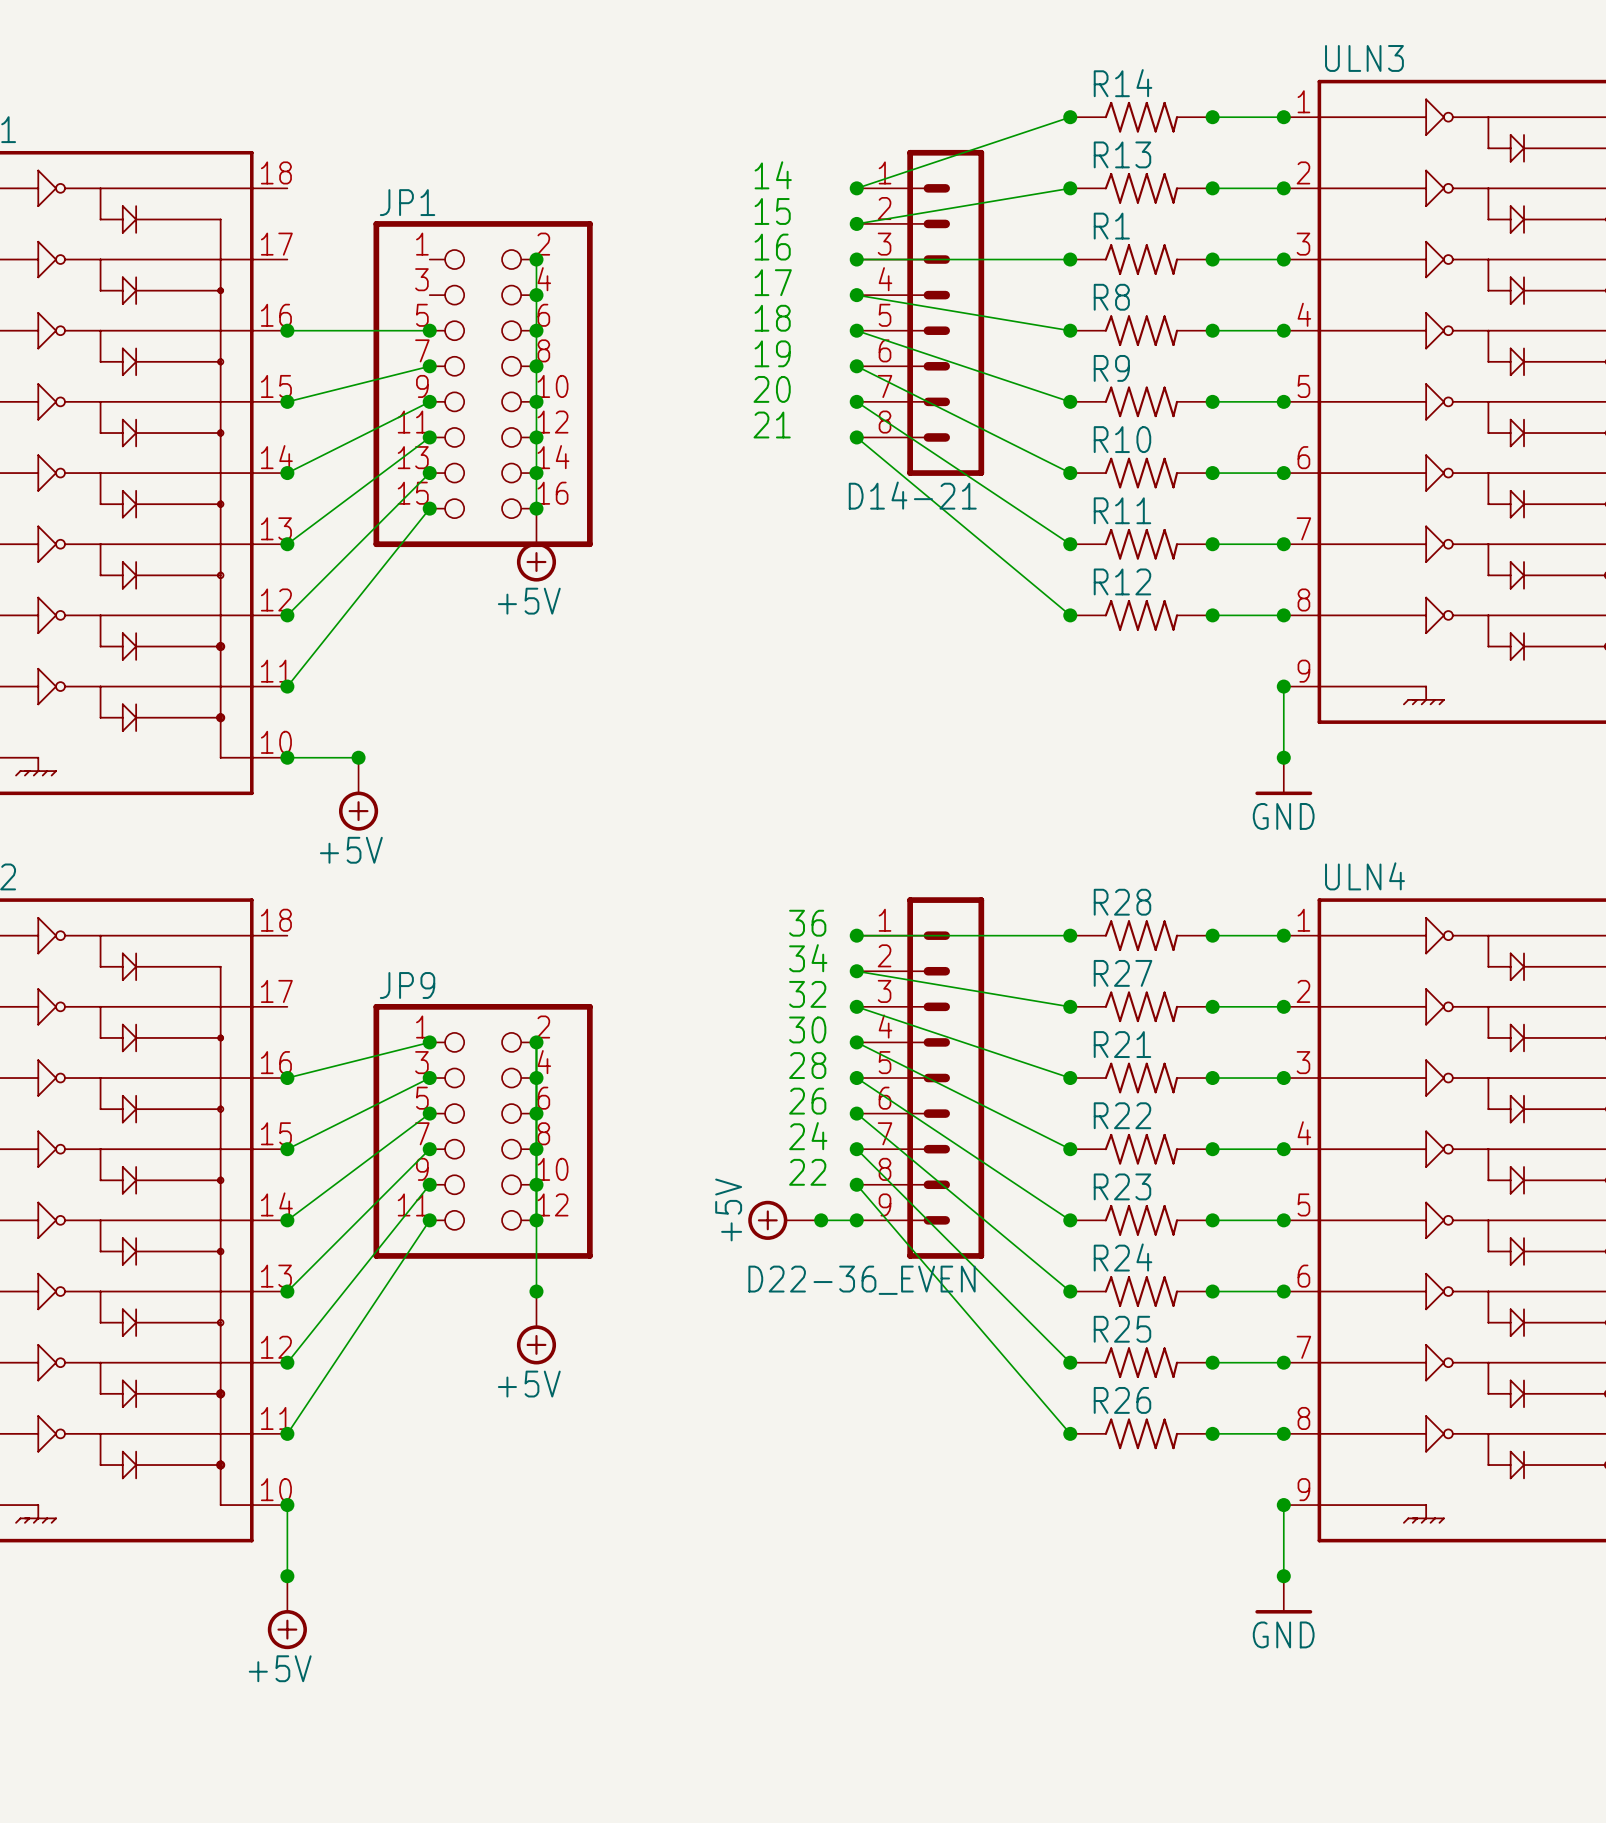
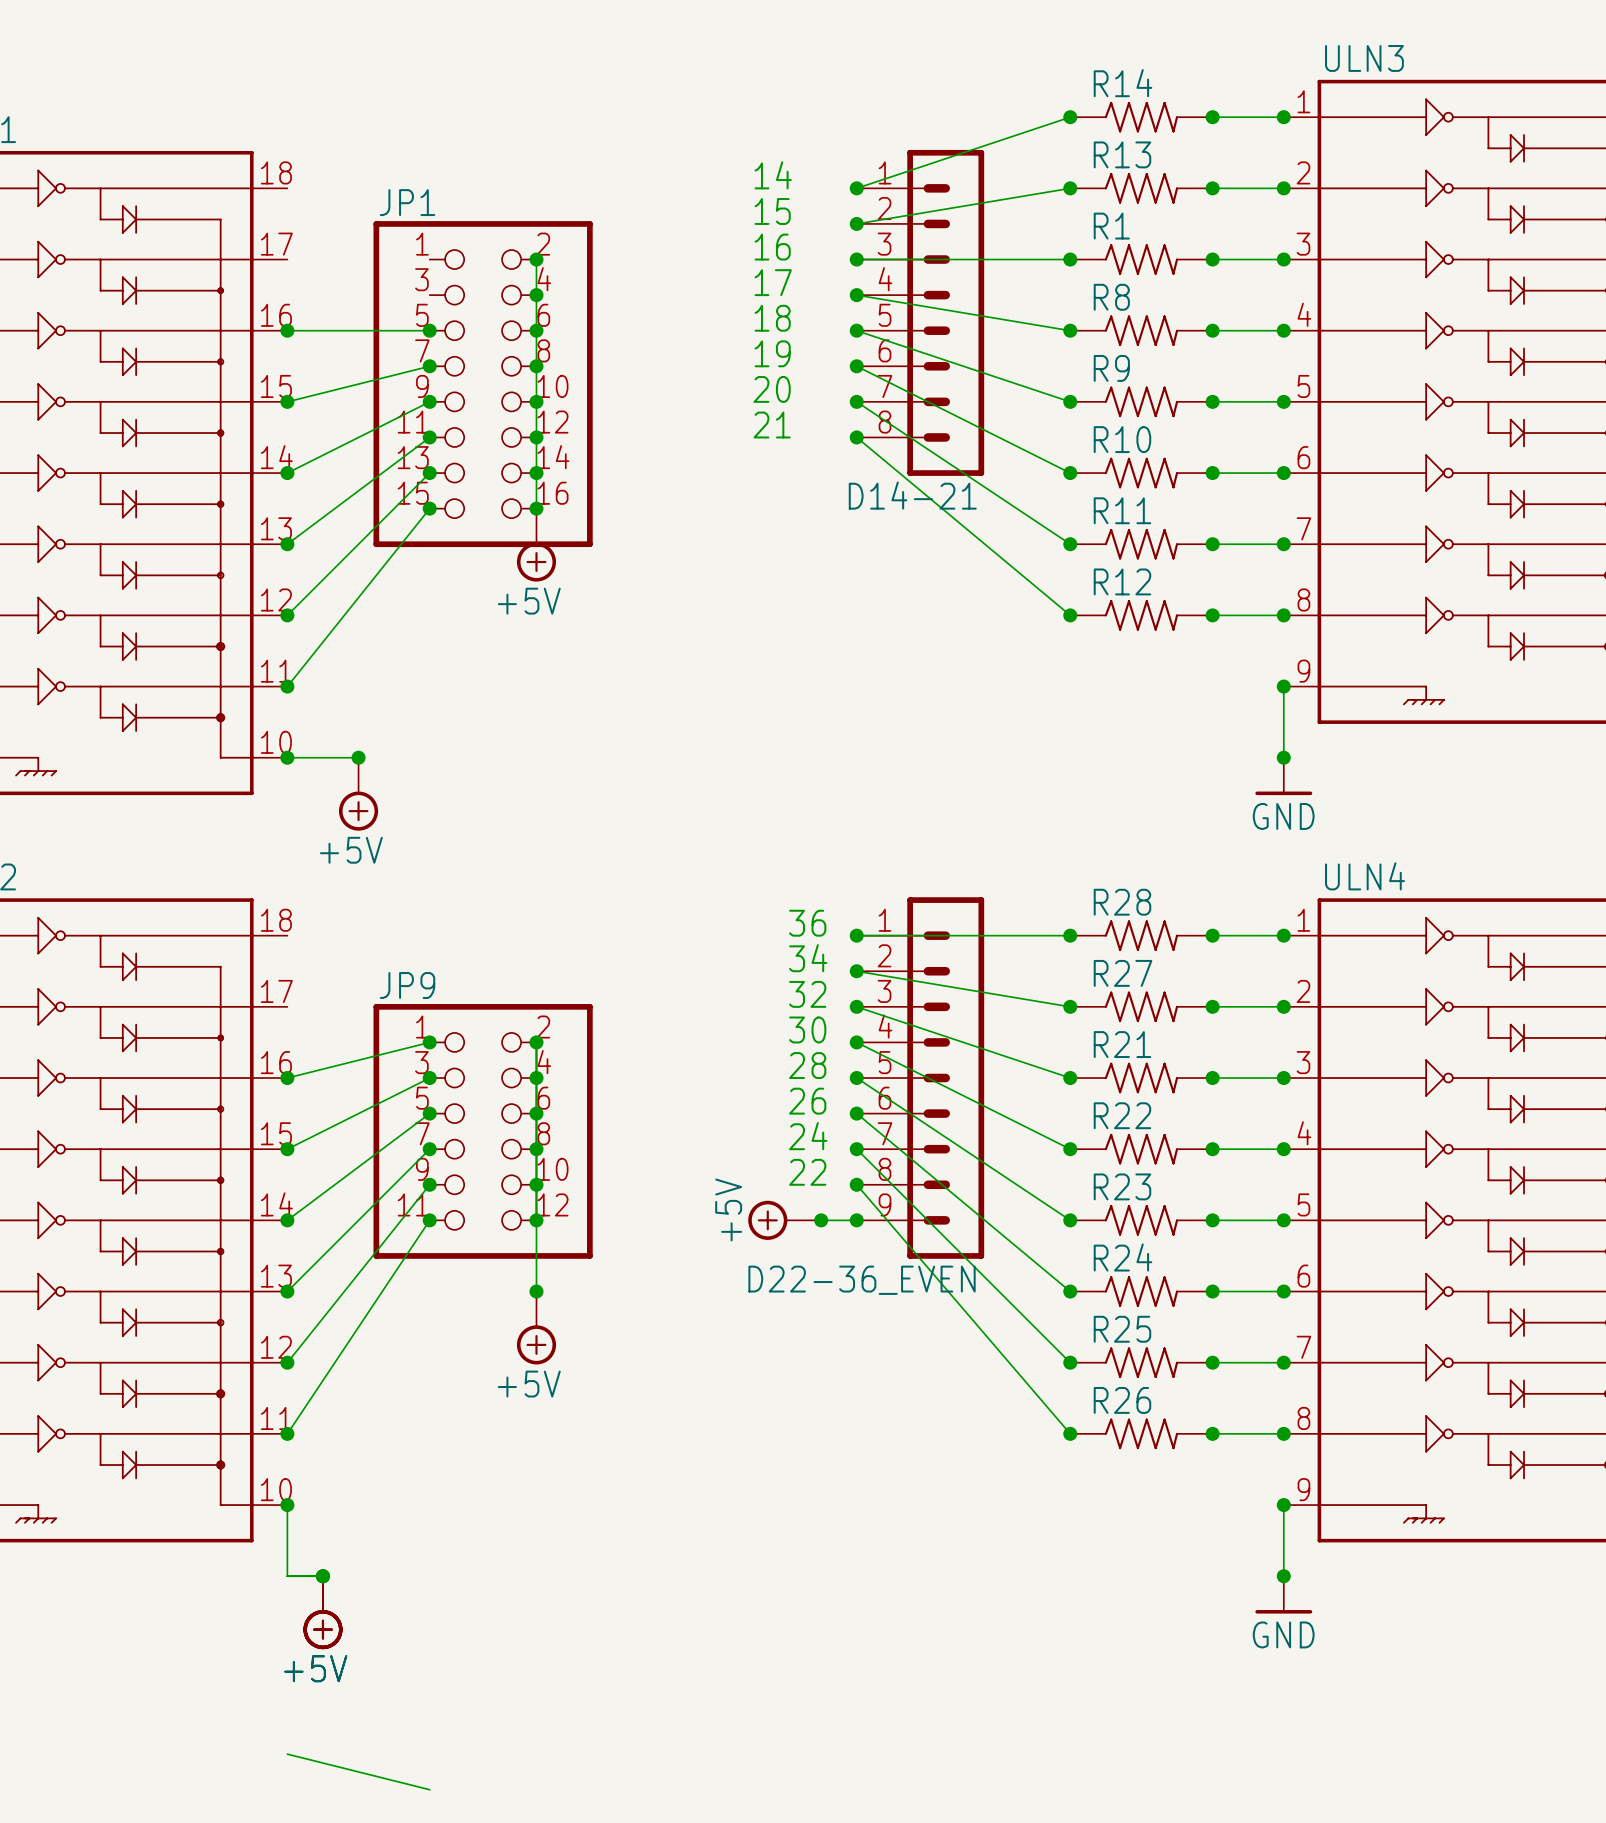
wire: none -> (287, 1576) (322, 1576)
junction position: (287, 1576) -> (322, 1576)
power symbol position: +5V (287, 1612) -> +5V (322, 1612)
wire: none -> (287, 1754) (429, 1789)

